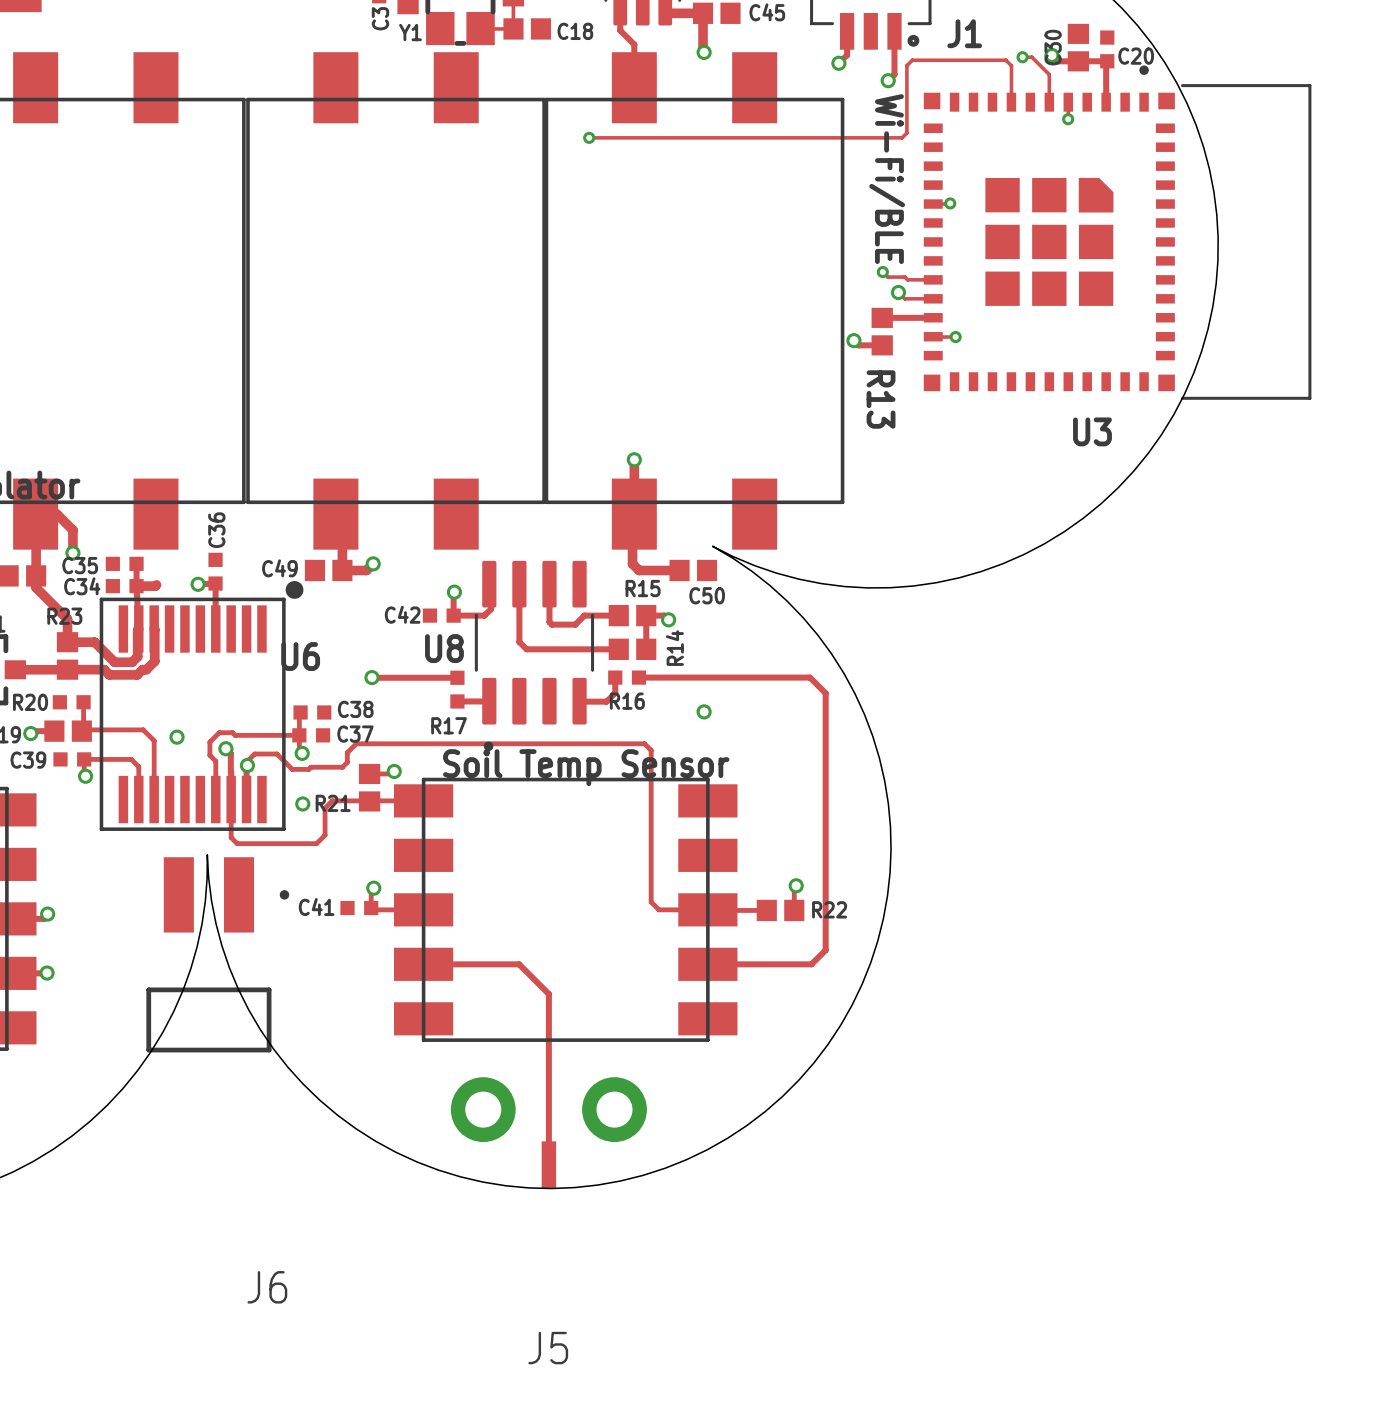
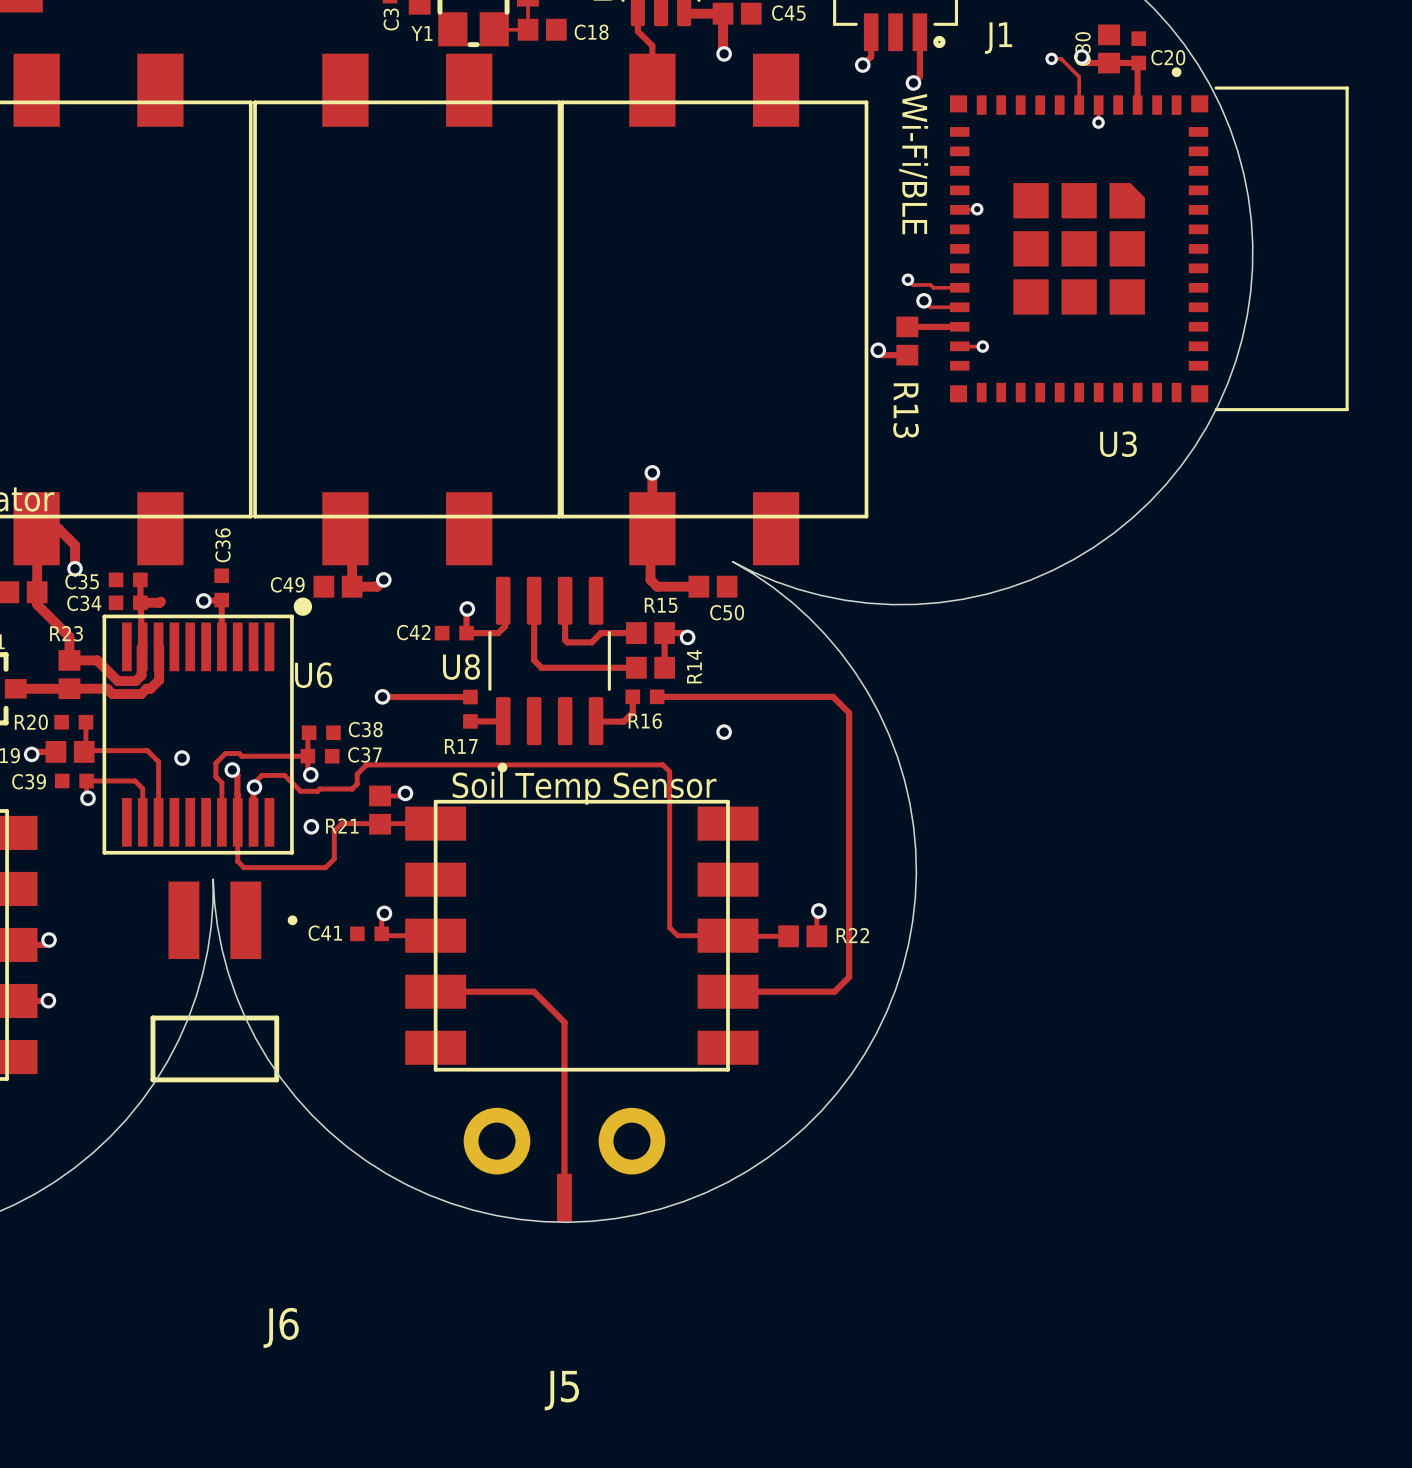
track: (1011, 102) (1011, 65) (1005, 60) (912, 60) (906, 65) (906, 133) (902, 137) (589, 137) -> none
via: (589, 137) -> none

